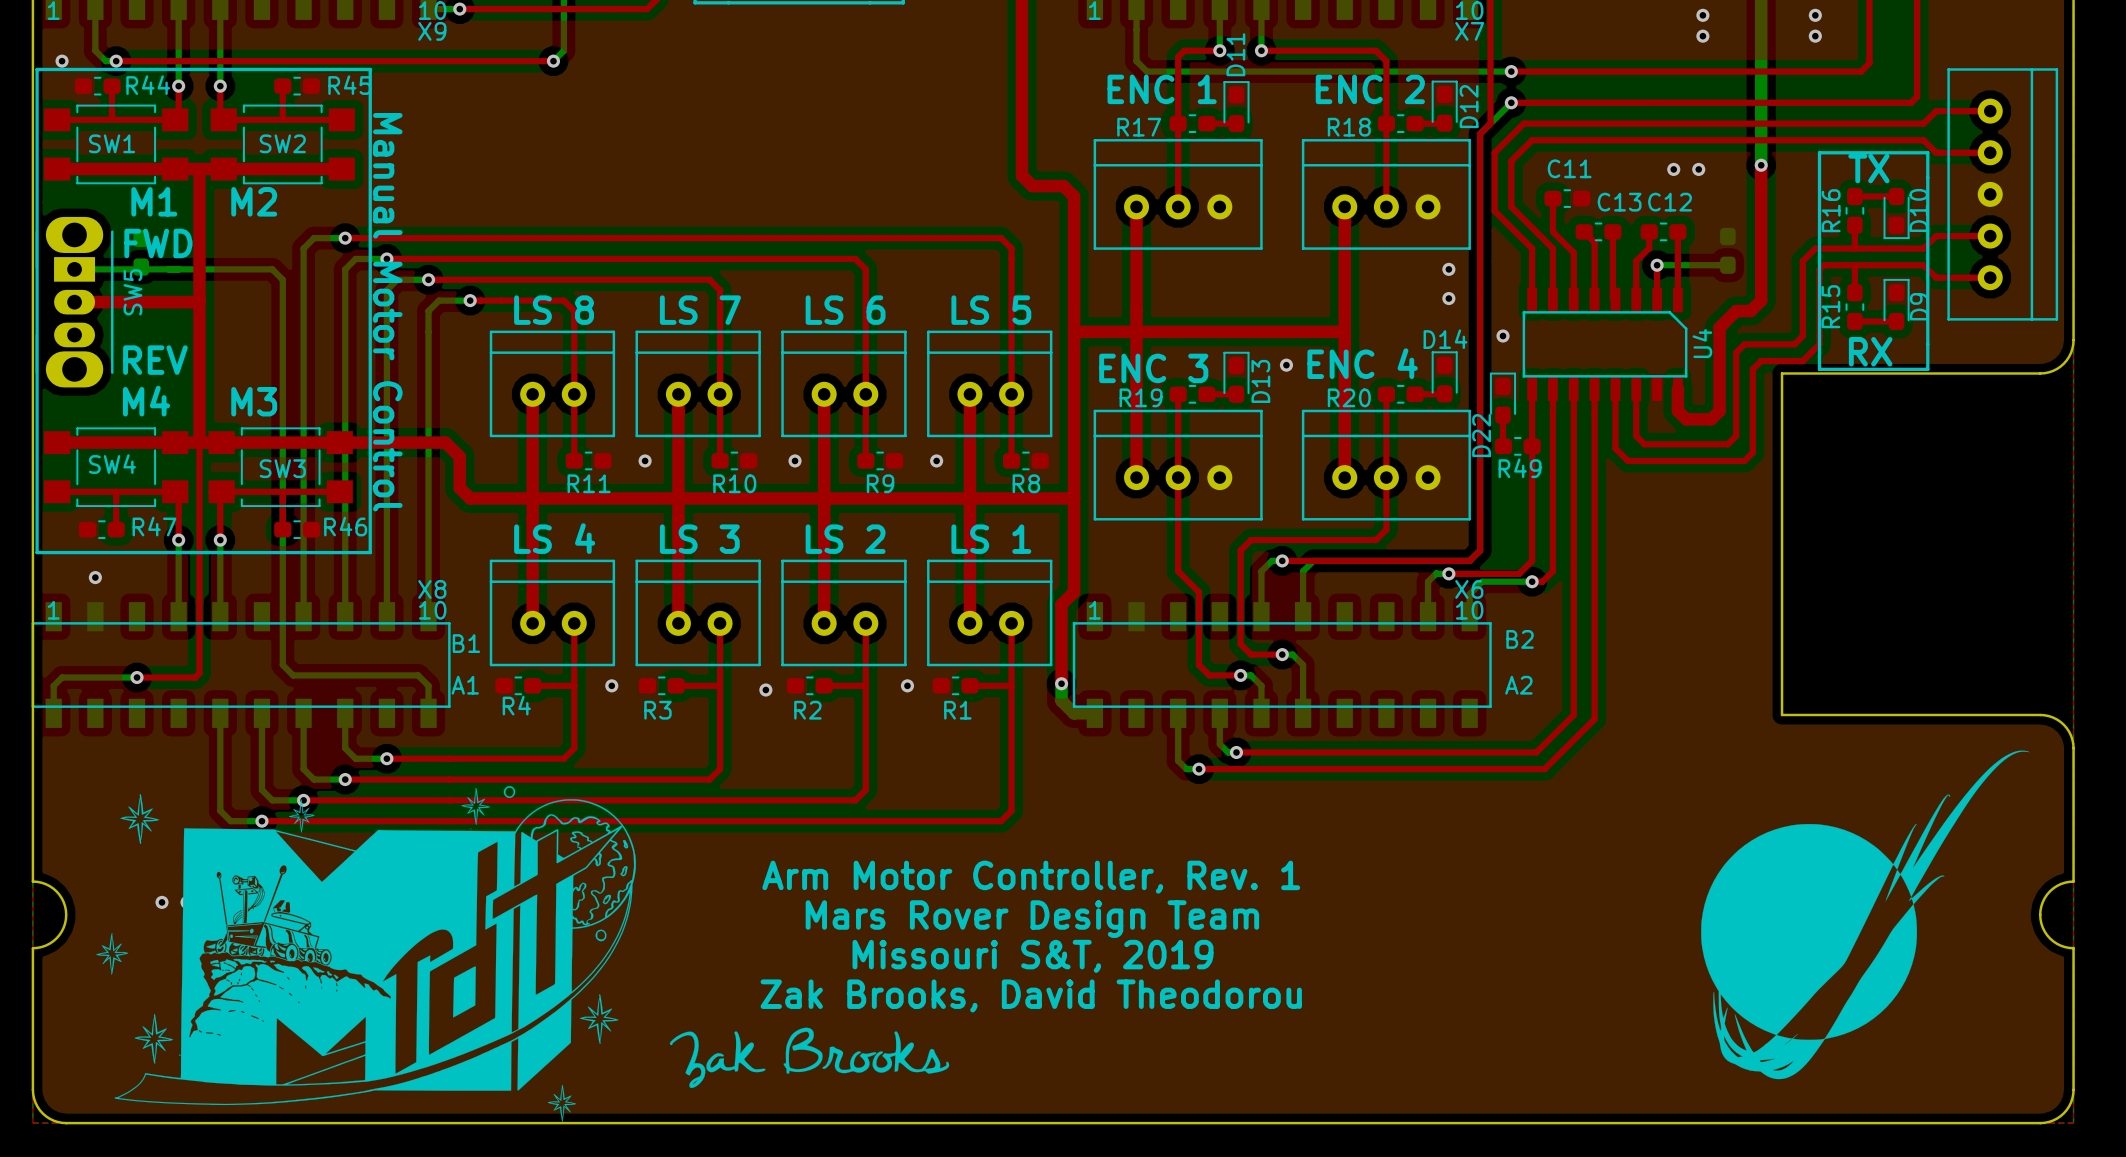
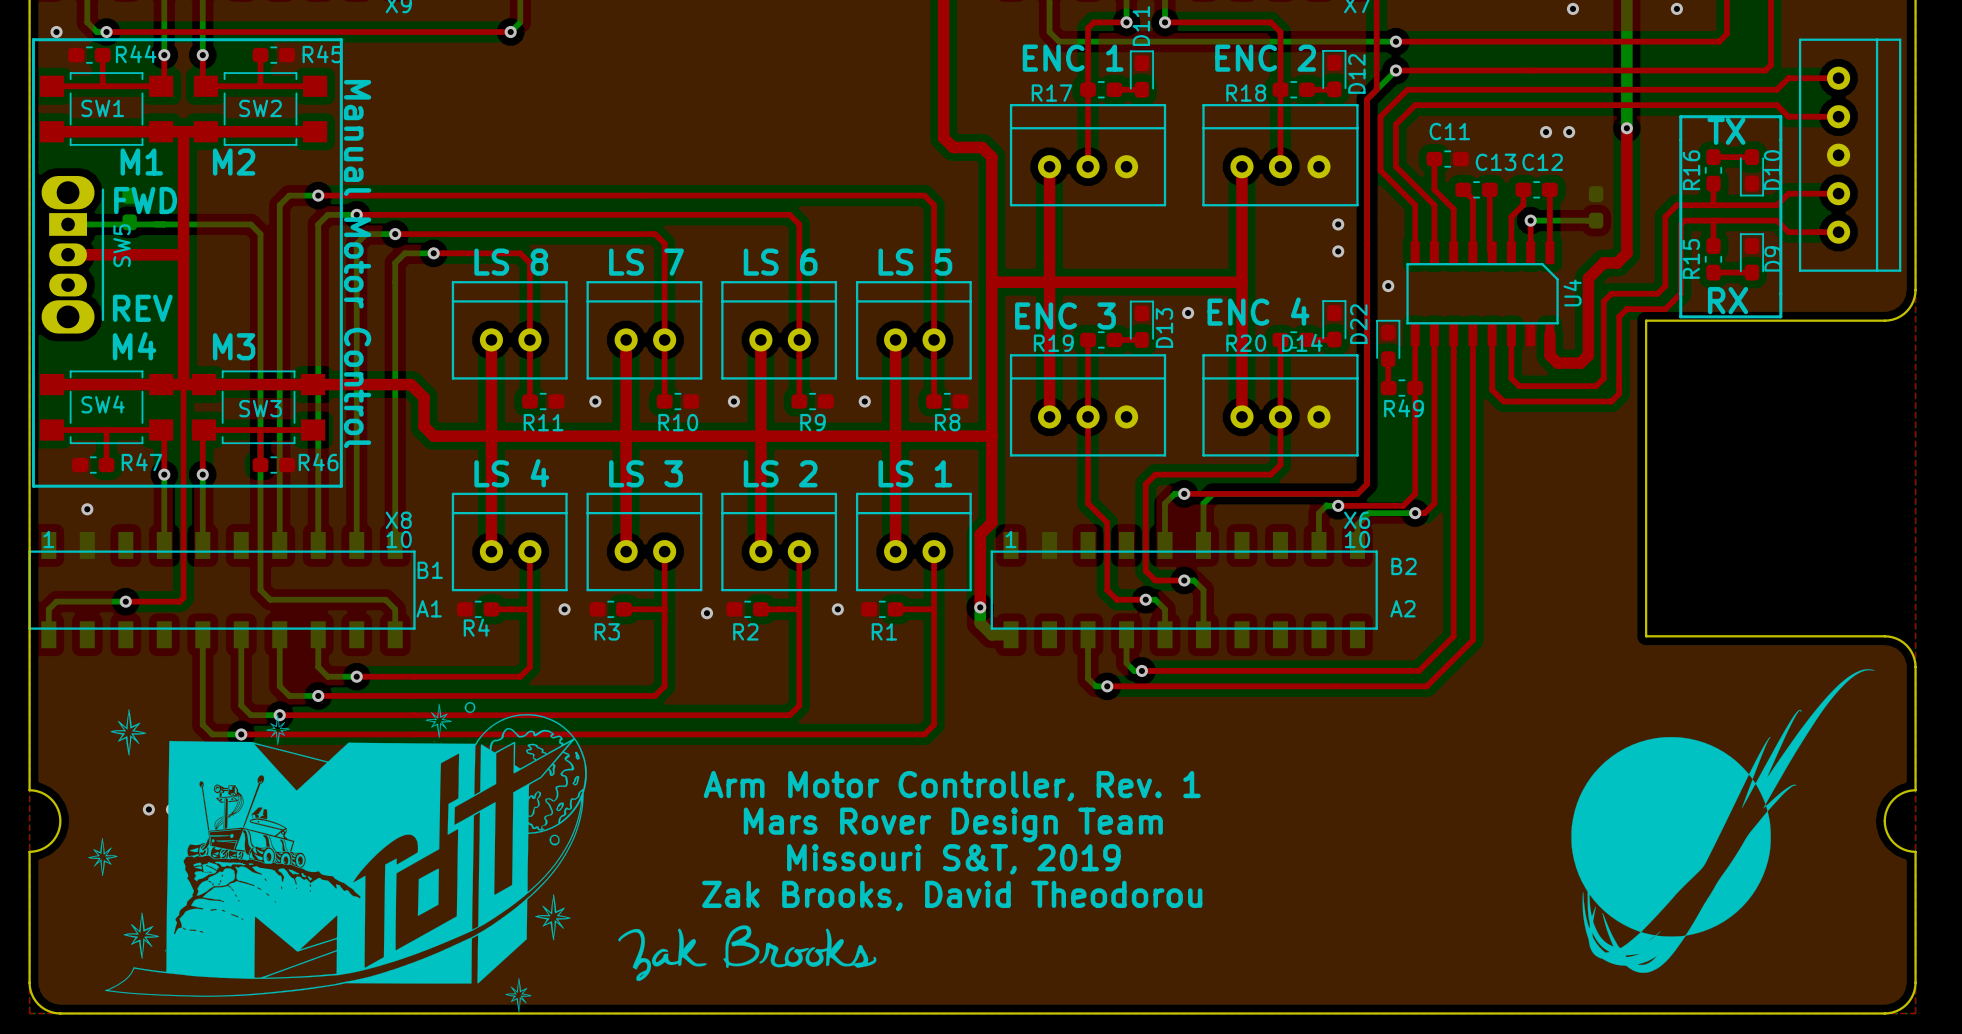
D14 name position: D14 (1445, 339) -> D14 (1302, 342)
D22 name position: D22 (1481, 435) -> D22 (1358, 324)

